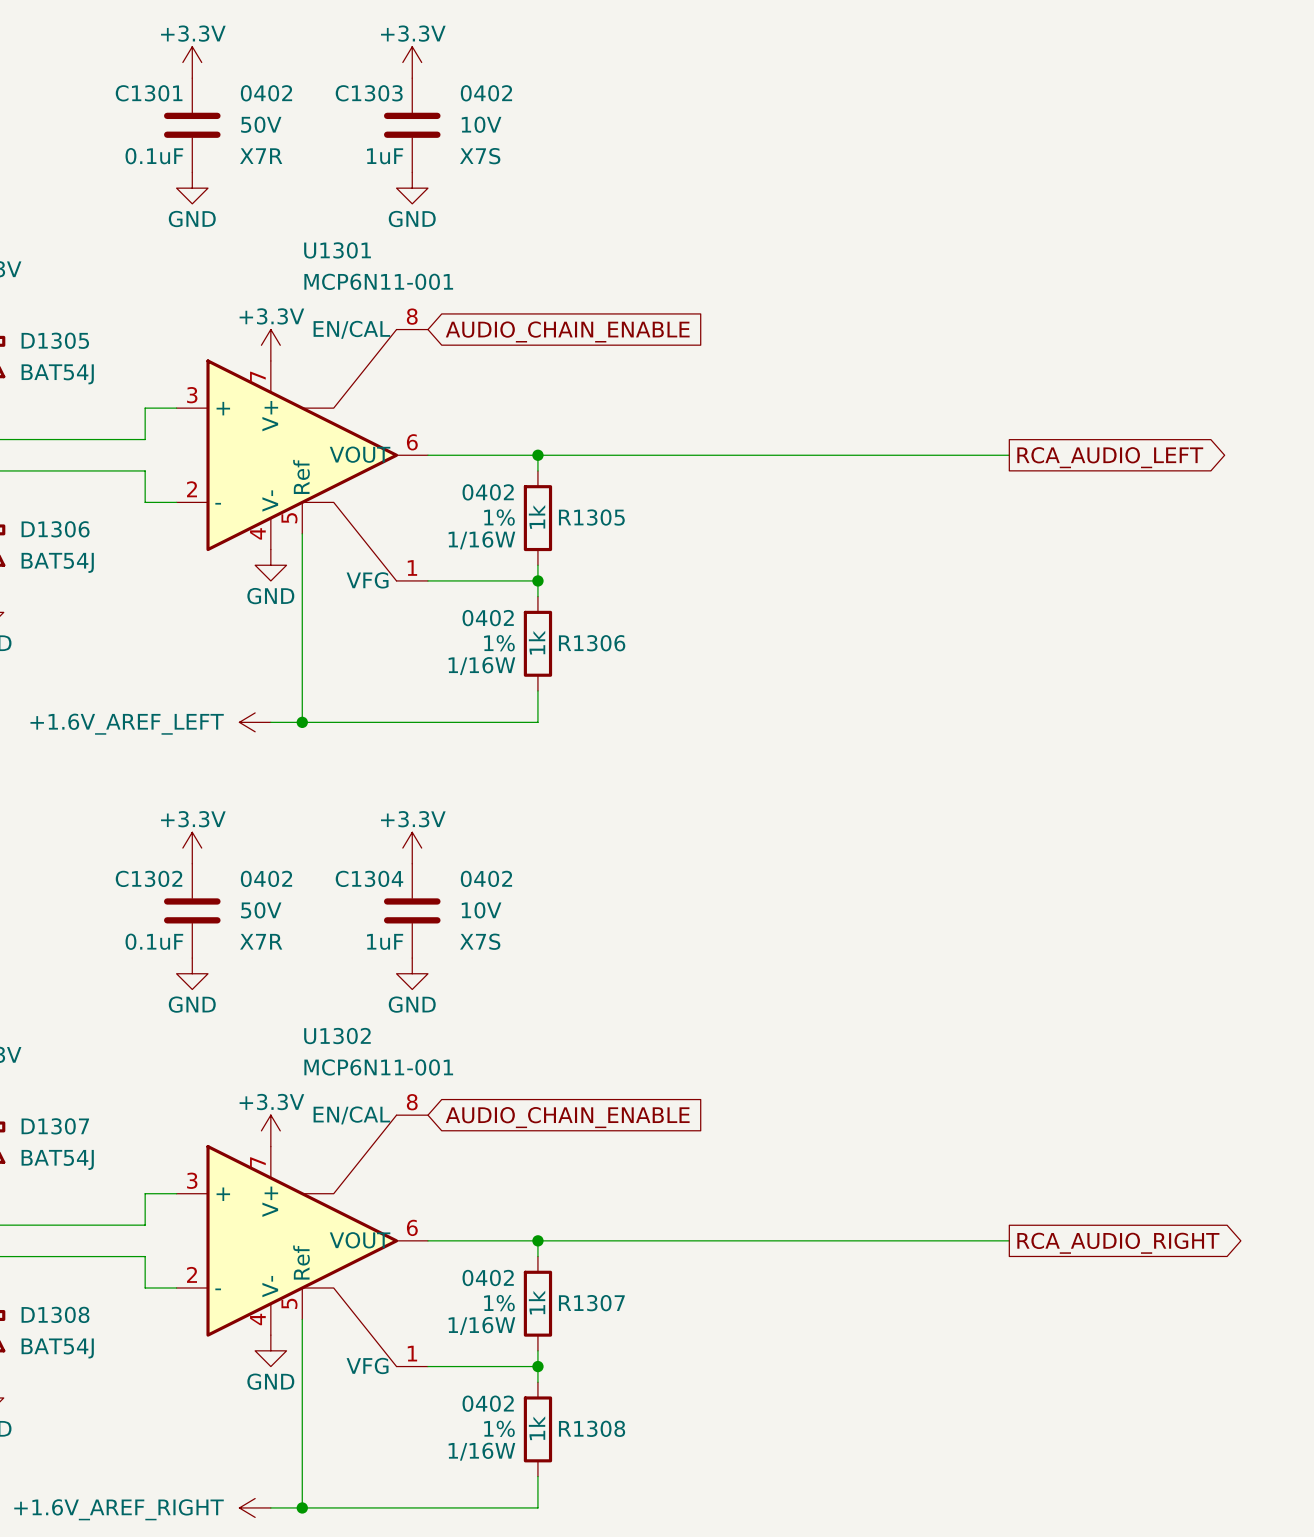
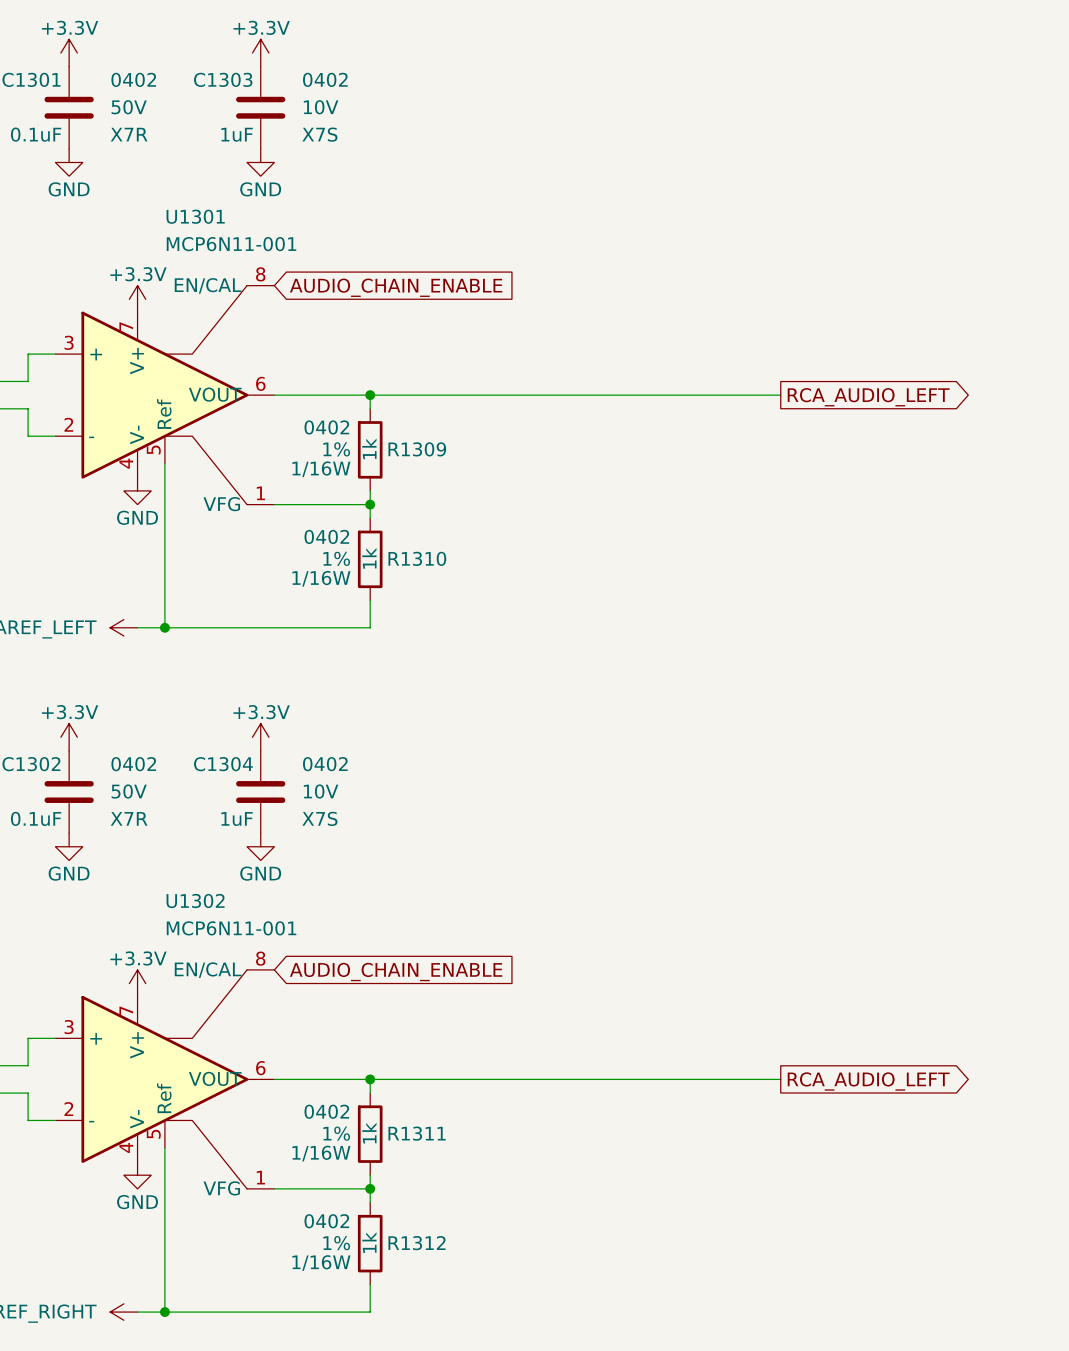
R1305 name: R1305 (591, 517) -> R1309 (417, 449)
R1306 name: R1306 (592, 643) -> R1310 (417, 558)
global label: RCA_AUDIO_RIGHT (1118, 1243) -> RCA_AUDIO_LEFT (868, 1081)
R1307 name: R1307 (591, 1303) -> R1311 (417, 1133)
R1308 name: R1308 (592, 1428) -> R1312 (417, 1243)

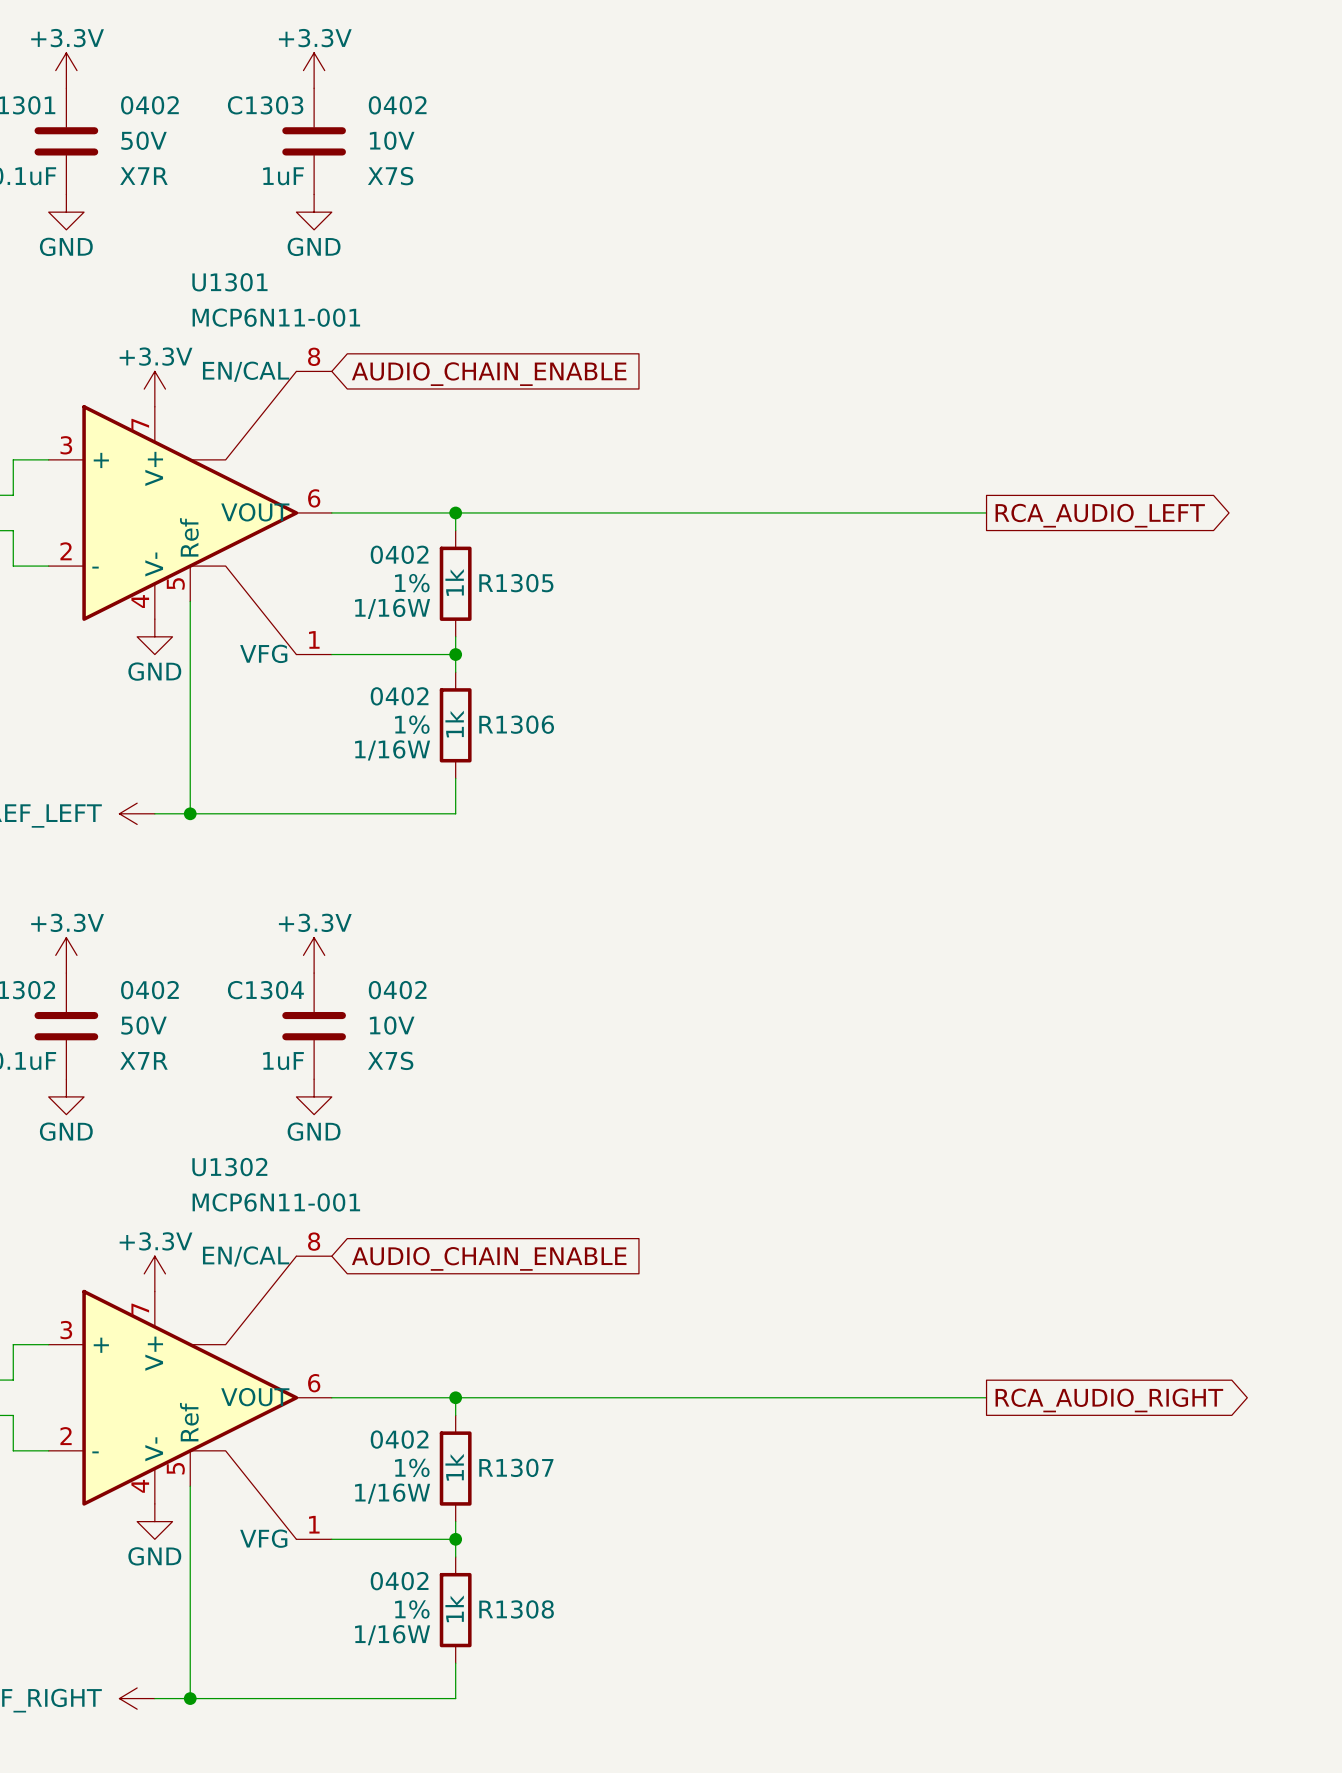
R1309 name: R1309 (417, 449) -> R1305 (516, 583)
R1310 name: R1310 (417, 558) -> R1306 (516, 724)
global label: RCA_AUDIO_LEFT (868, 1081) -> RCA_AUDIO_RIGHT (1109, 1400)
R1311 name: R1311 (417, 1133) -> R1307 (516, 1467)
R1312 name: R1312 (417, 1243) -> R1308 (516, 1609)

